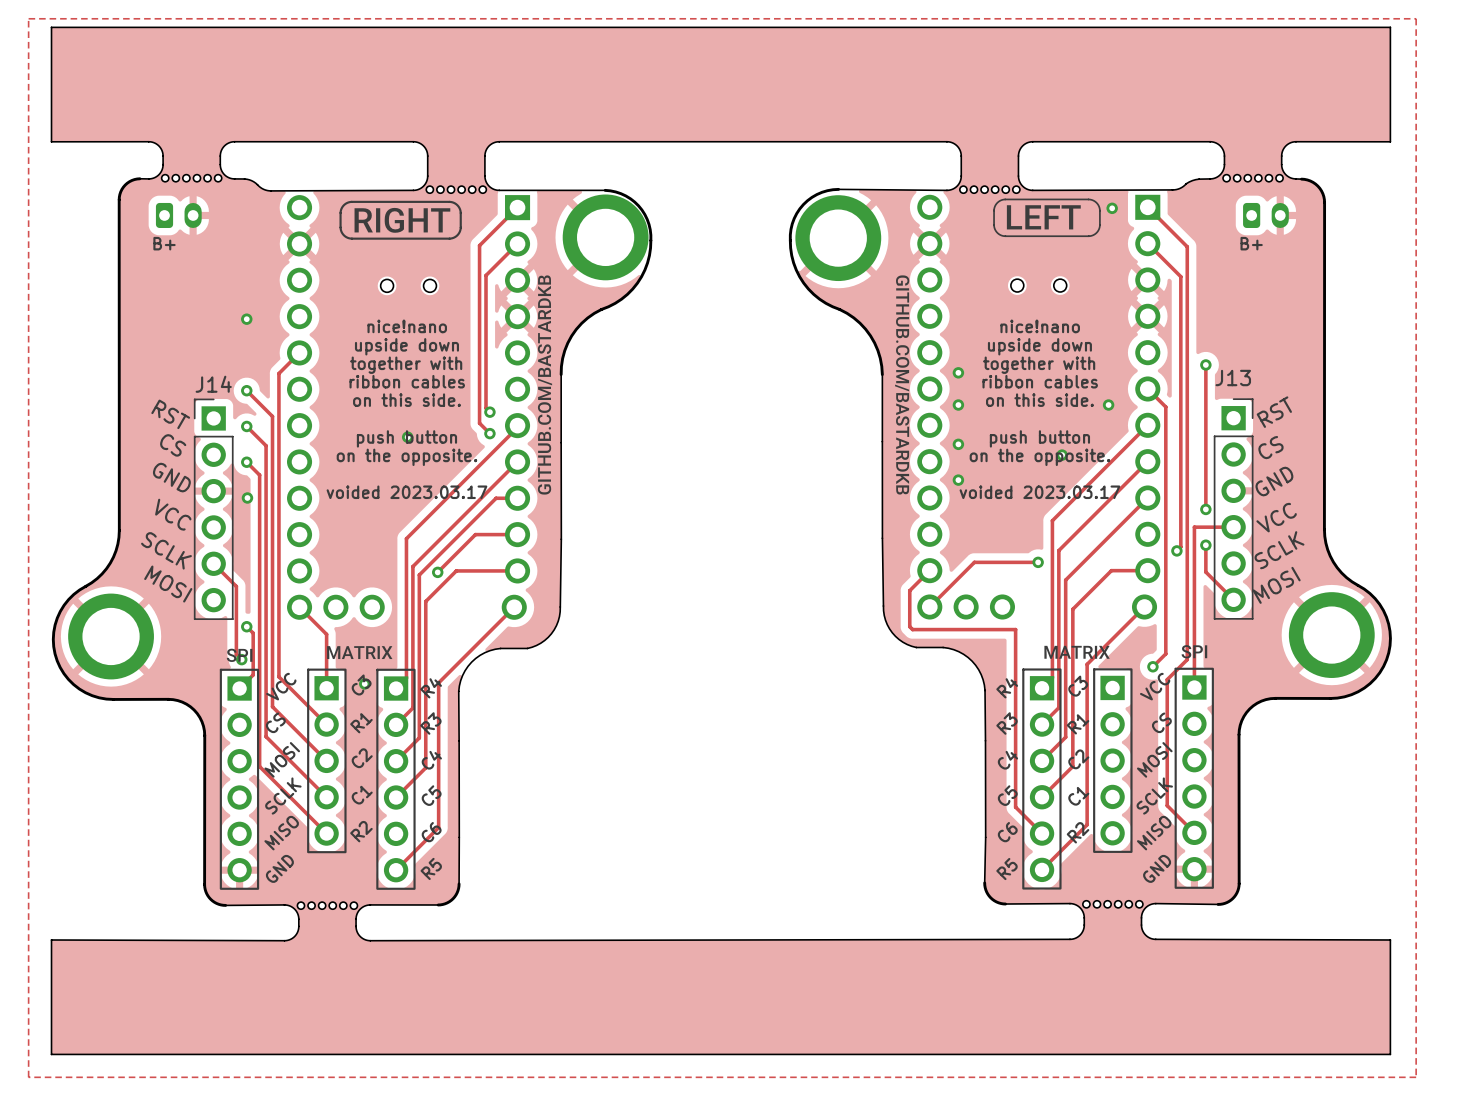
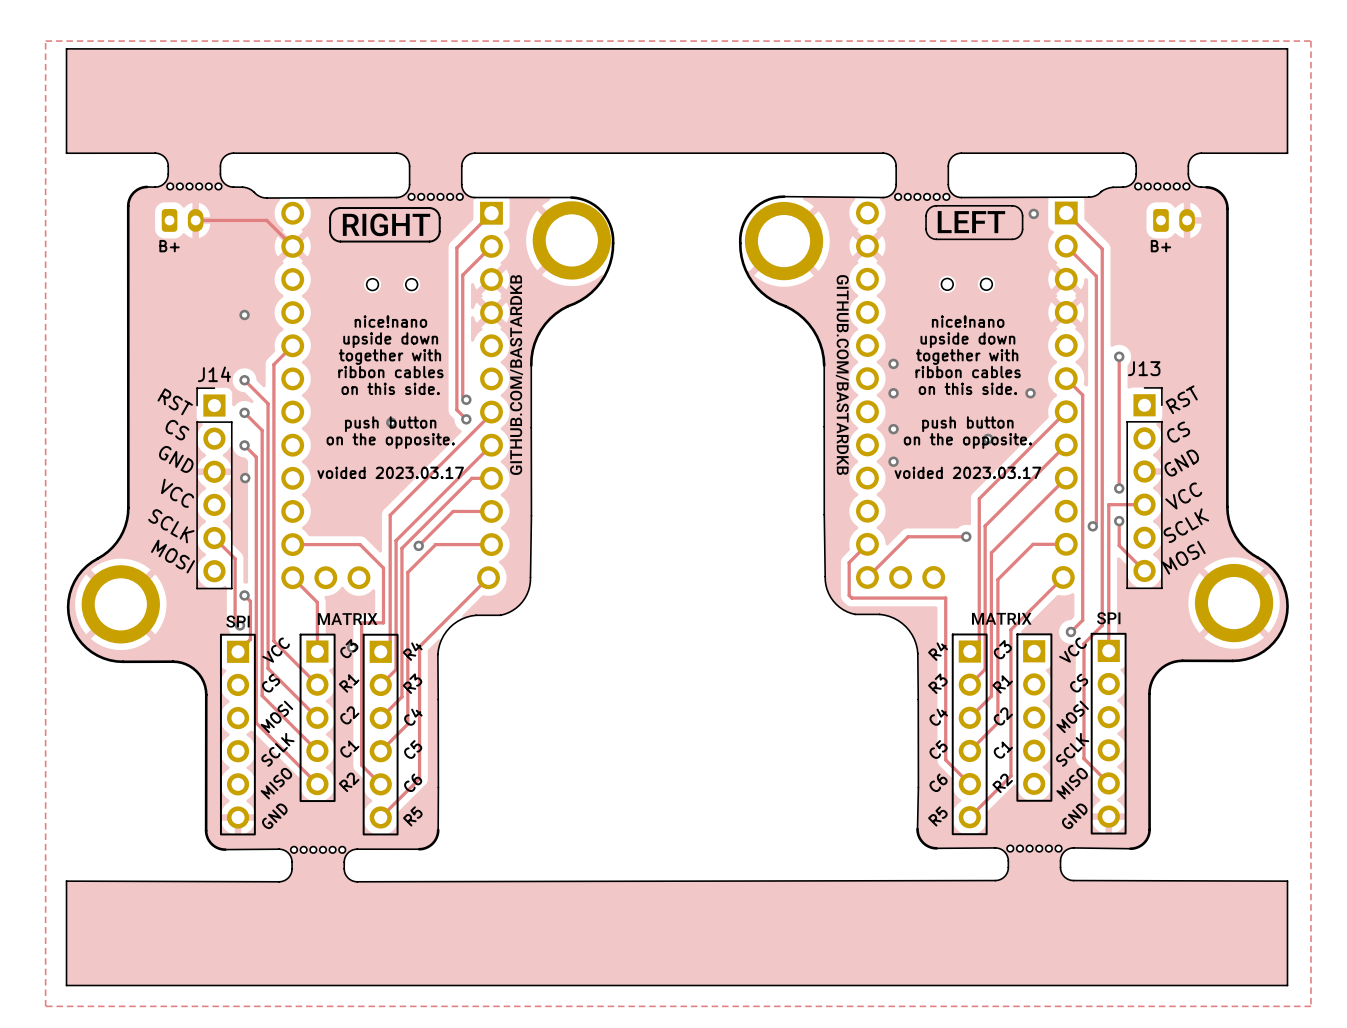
track: none -> (195, 220) (266, 220) (292, 246)
track: none -> (292, 544) (360, 544) (383, 568) (383, 622) (361, 622) (361, 765) (380, 784)

